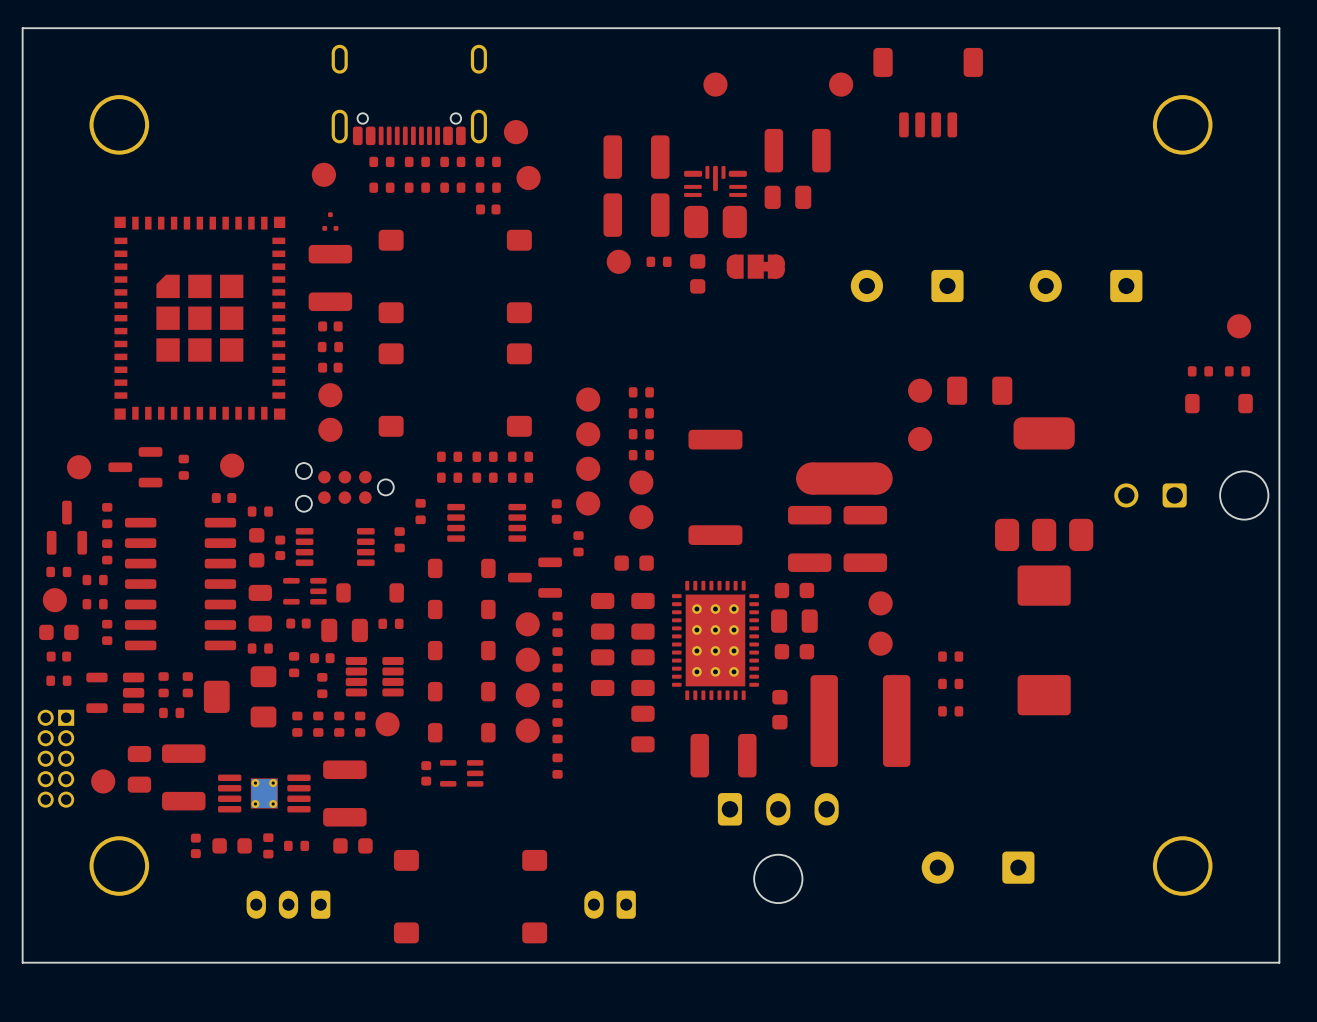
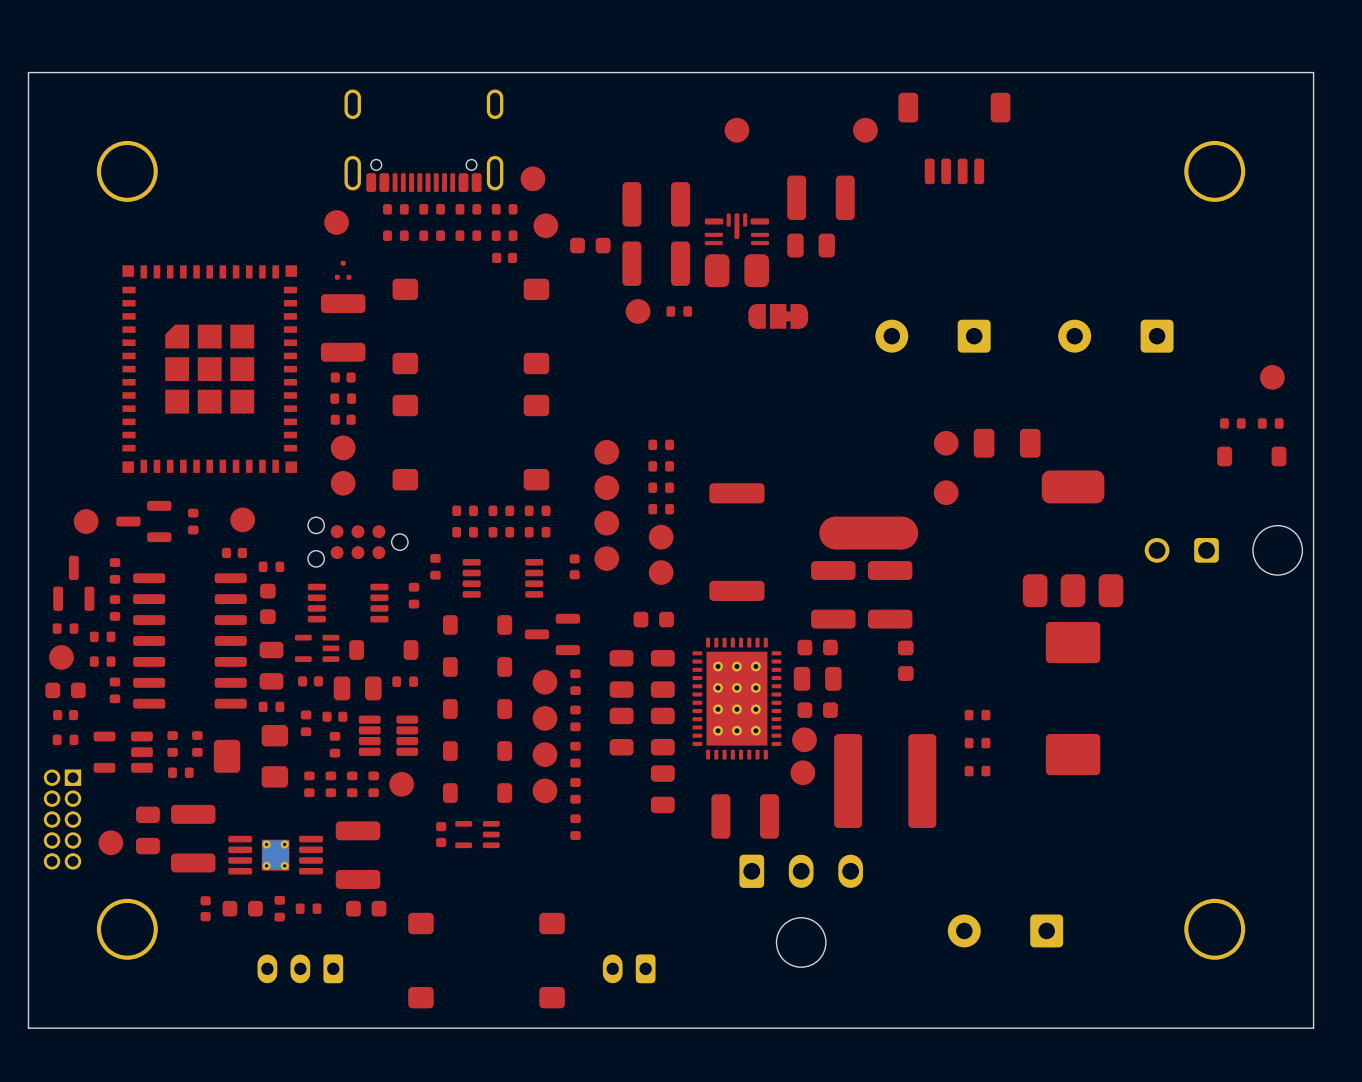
part rotation: 0° (697, 273) -> 90° clockwise (590, 245)
part position: (697, 273) -> (590, 245)
part: (578, 543) -> none
part: (280, 547) -> none
part footprint: [868, 591, 893, 616] -> [897, 640, 914, 681]
part position: (880, 643) -> (804, 739)
part footprint: [772, 690, 788, 730] -> [790, 760, 816, 786]

